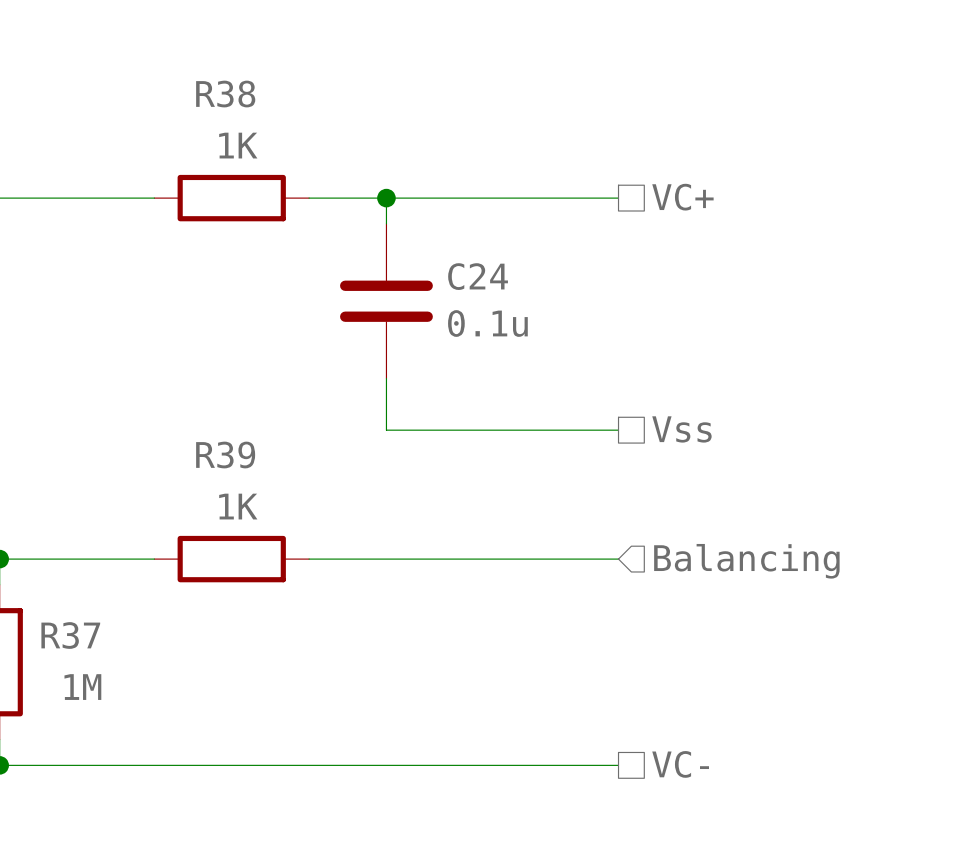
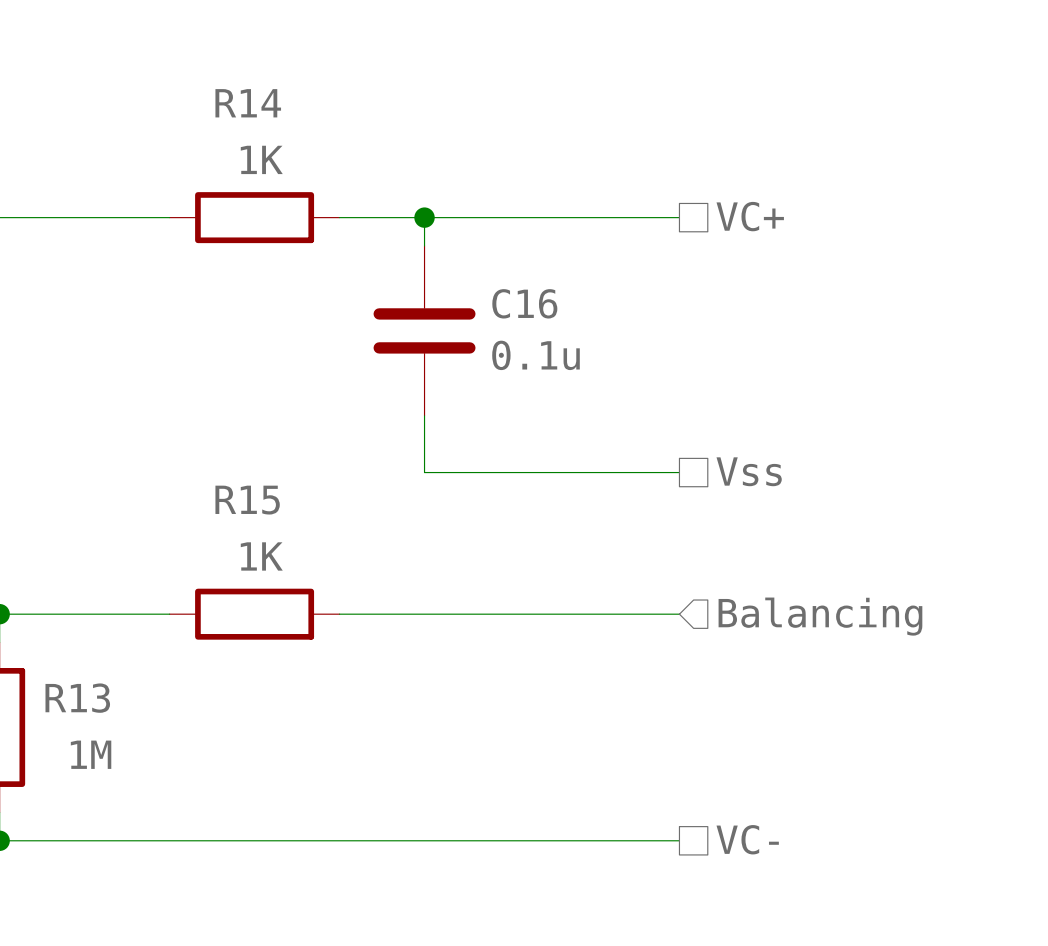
R38 name: R38 (225, 94) -> R14 (248, 103)
C24 name: C24 (478, 276) -> C16 (524, 303)
R39 name: R39 (225, 455) -> R15 (247, 500)
R37 name: R37 (70, 635) -> R13 (77, 698)

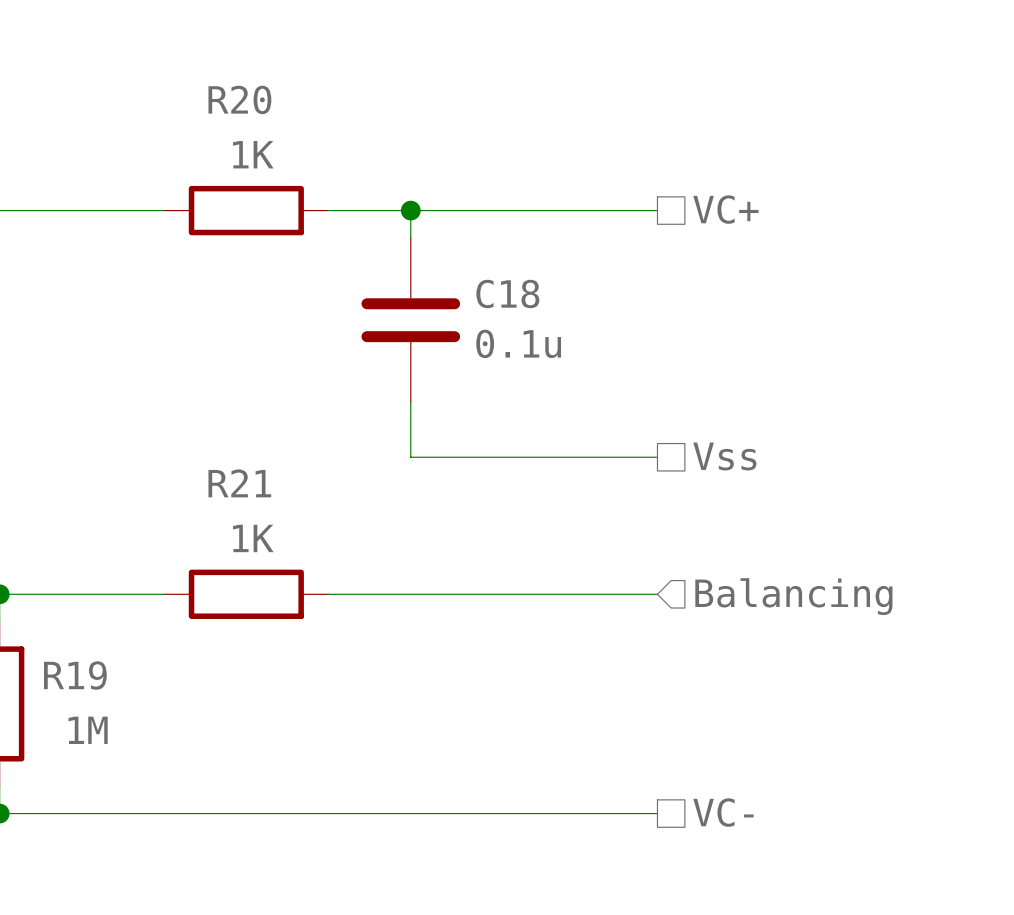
R14 name: R14 (248, 103) -> R20 (239, 99)
C16 name: C16 (524, 303) -> C18 (507, 293)
R15 name: R15 (247, 500) -> R21 (239, 483)
R13 name: R13 (77, 698) -> R19 (75, 675)

